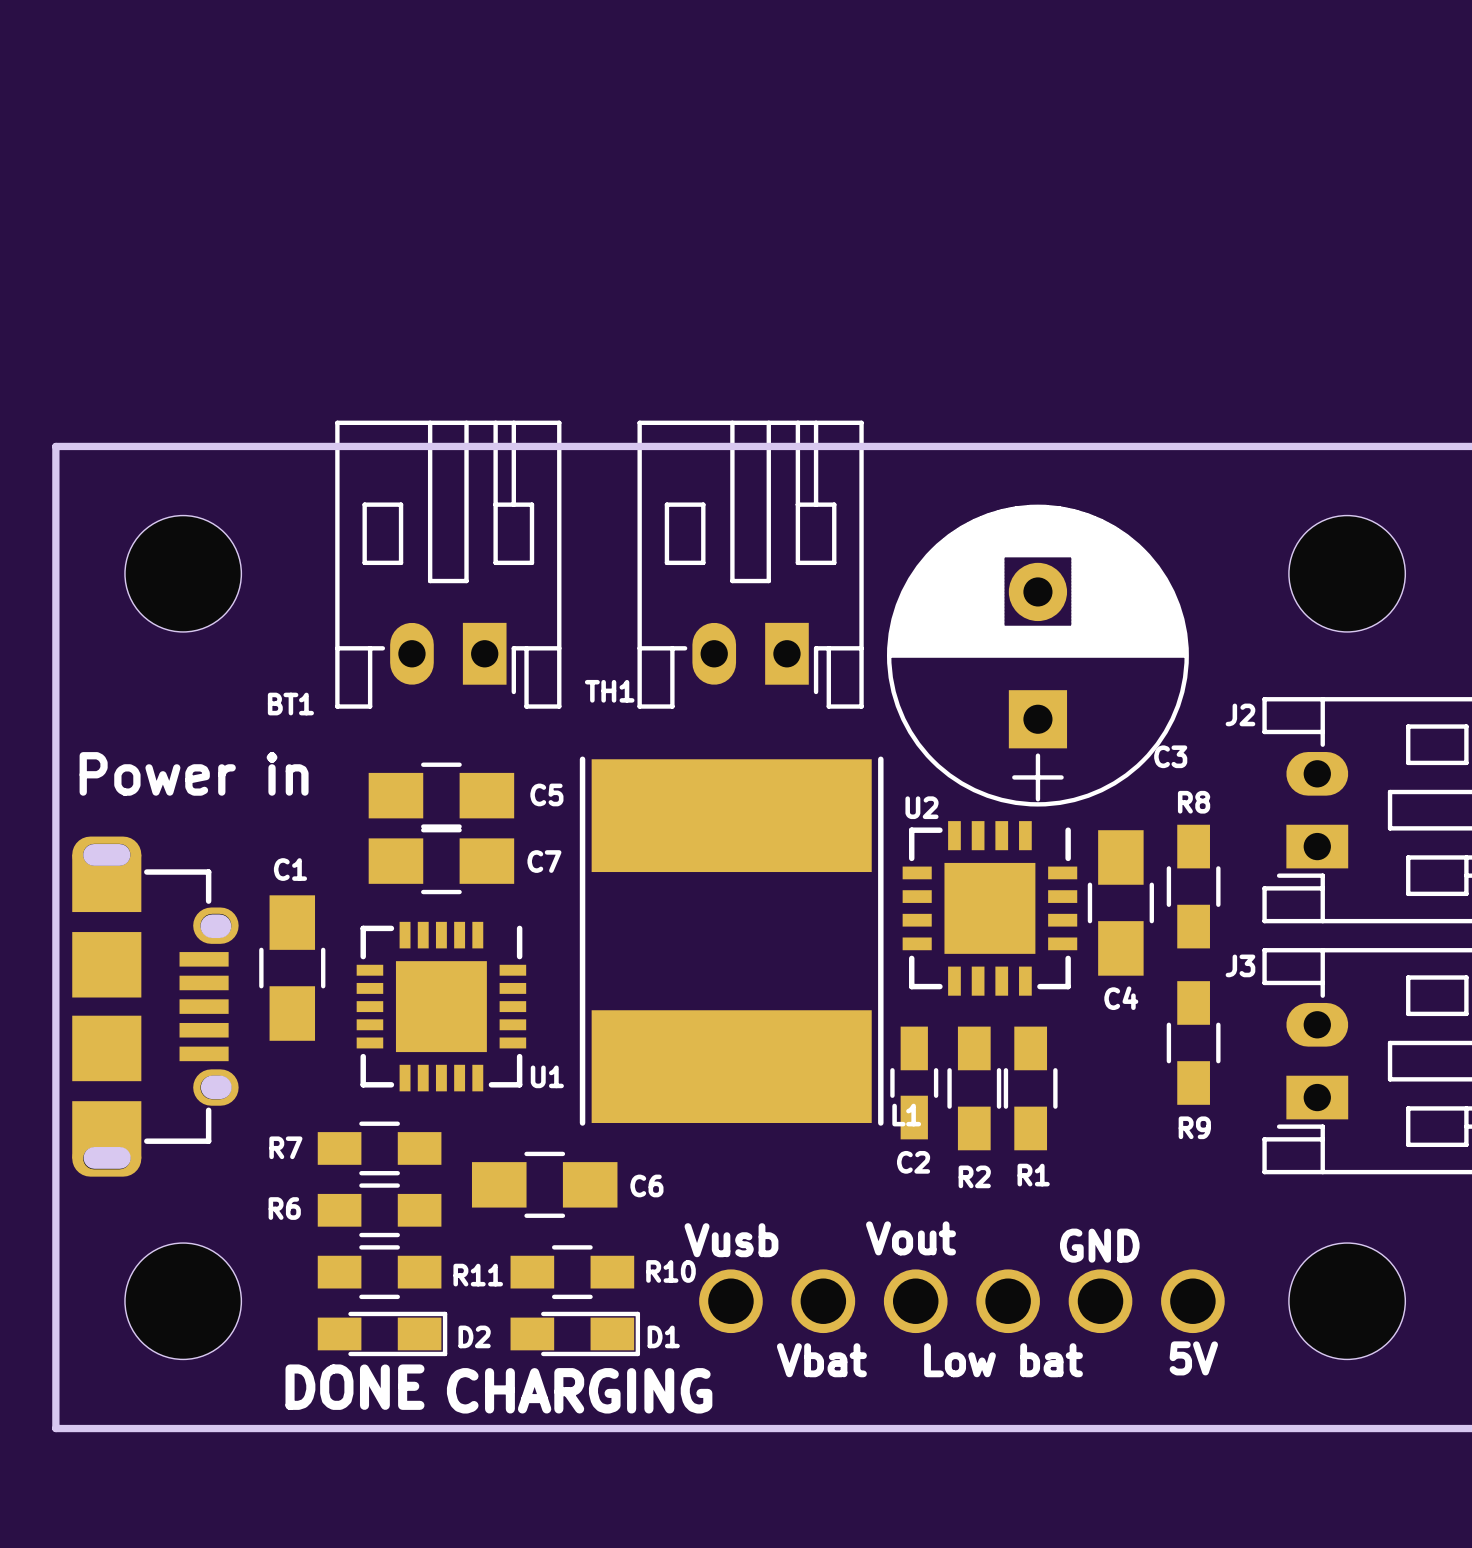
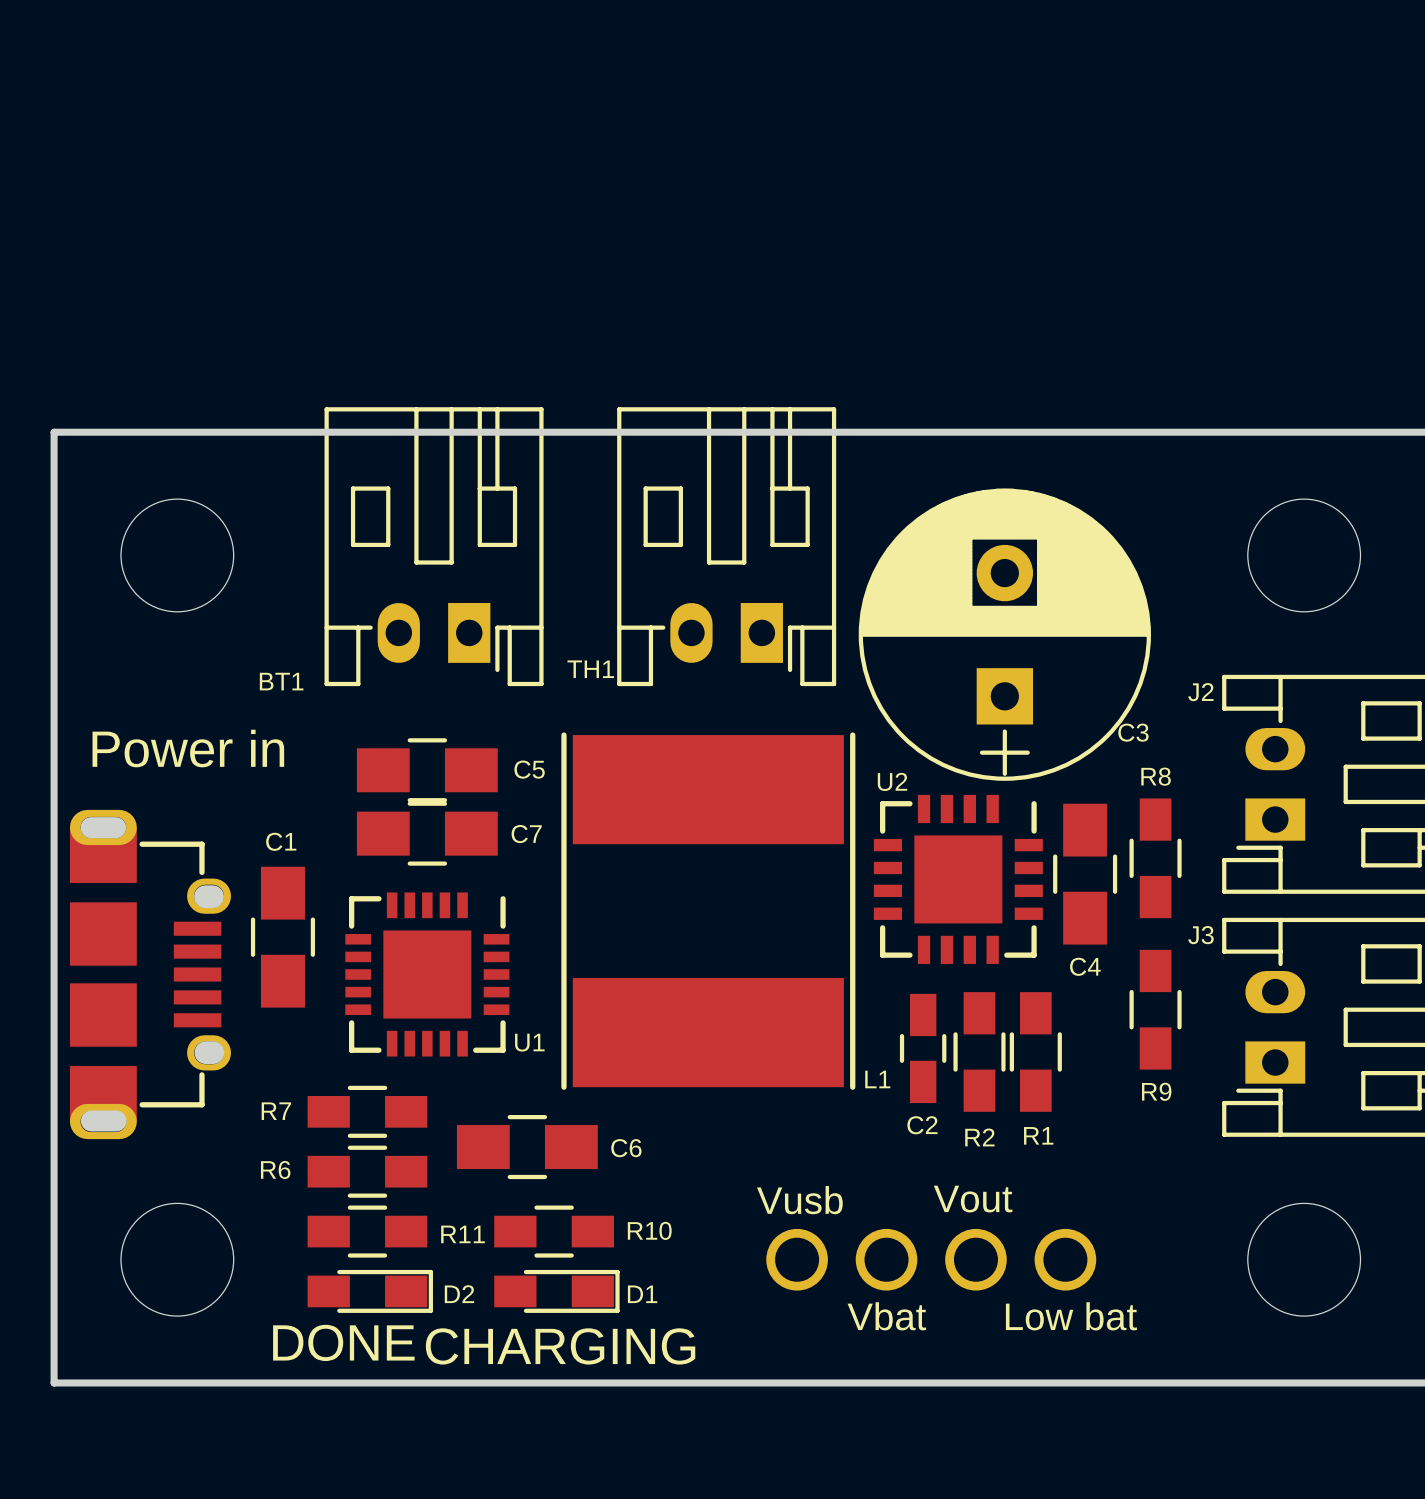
C2 position: (914, 1082) -> (923, 1048)
R2 position: (974, 1088) -> (979, 1051)
R1 position: (1030, 1088) -> (1035, 1051)
text position: Vout (911, 1238) -> Vout (973, 1199)
text position: Vusb (731, 1240) -> Vusb (799, 1200)
text: GND (1099, 1245) -> none
part: (730, 1301) -> none
part: (1192, 1301) -> none
text: 5V (1193, 1358) -> none
text position: Vbat (821, 1360) -> Vbat (886, 1316)
text position: Low bat (1003, 1360) -> Low bat (1071, 1316)

